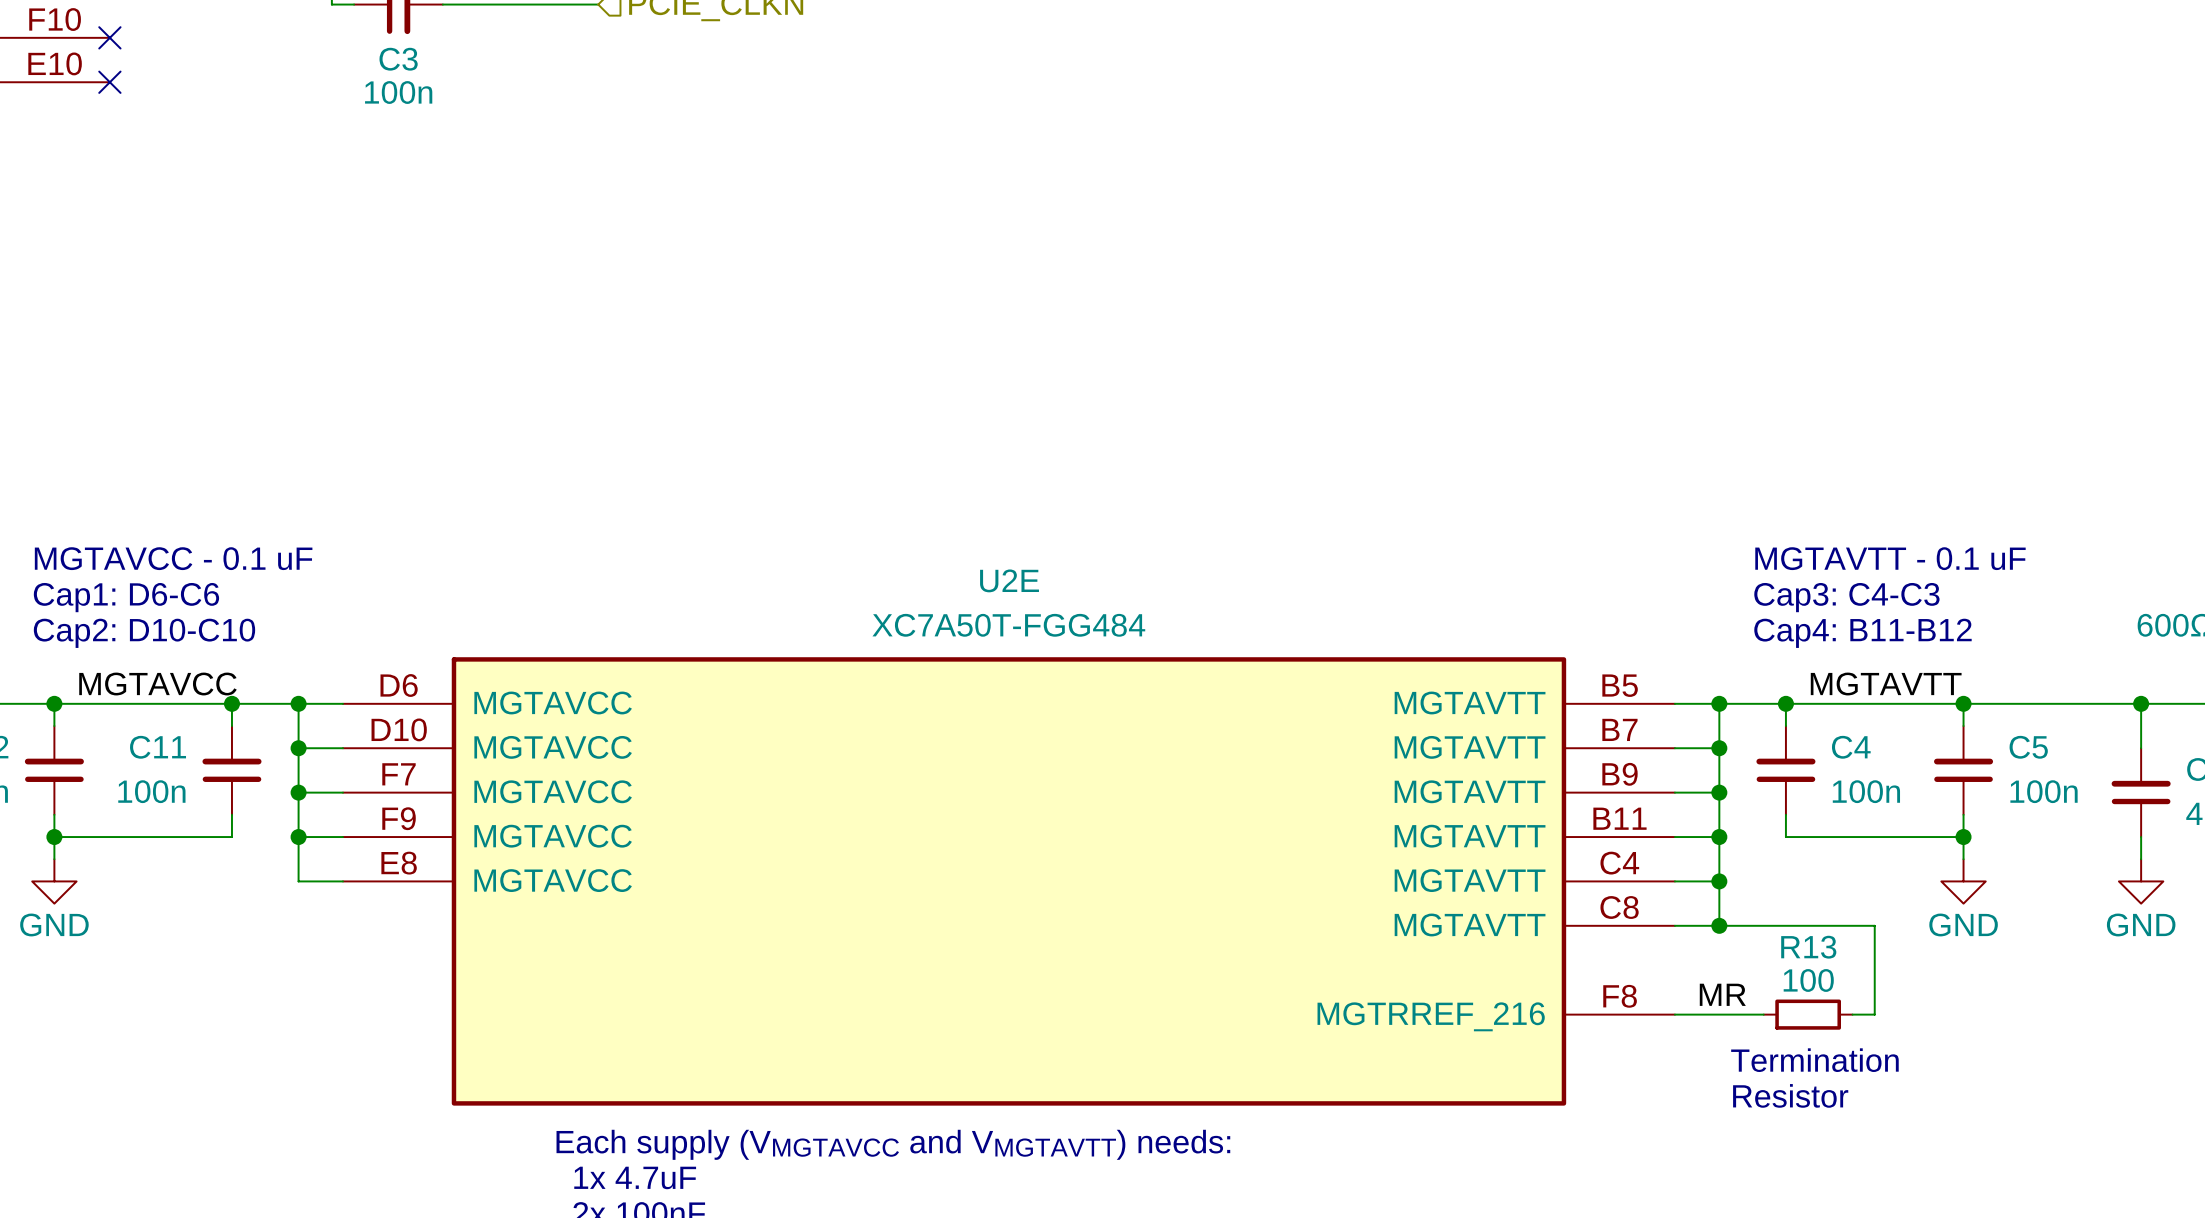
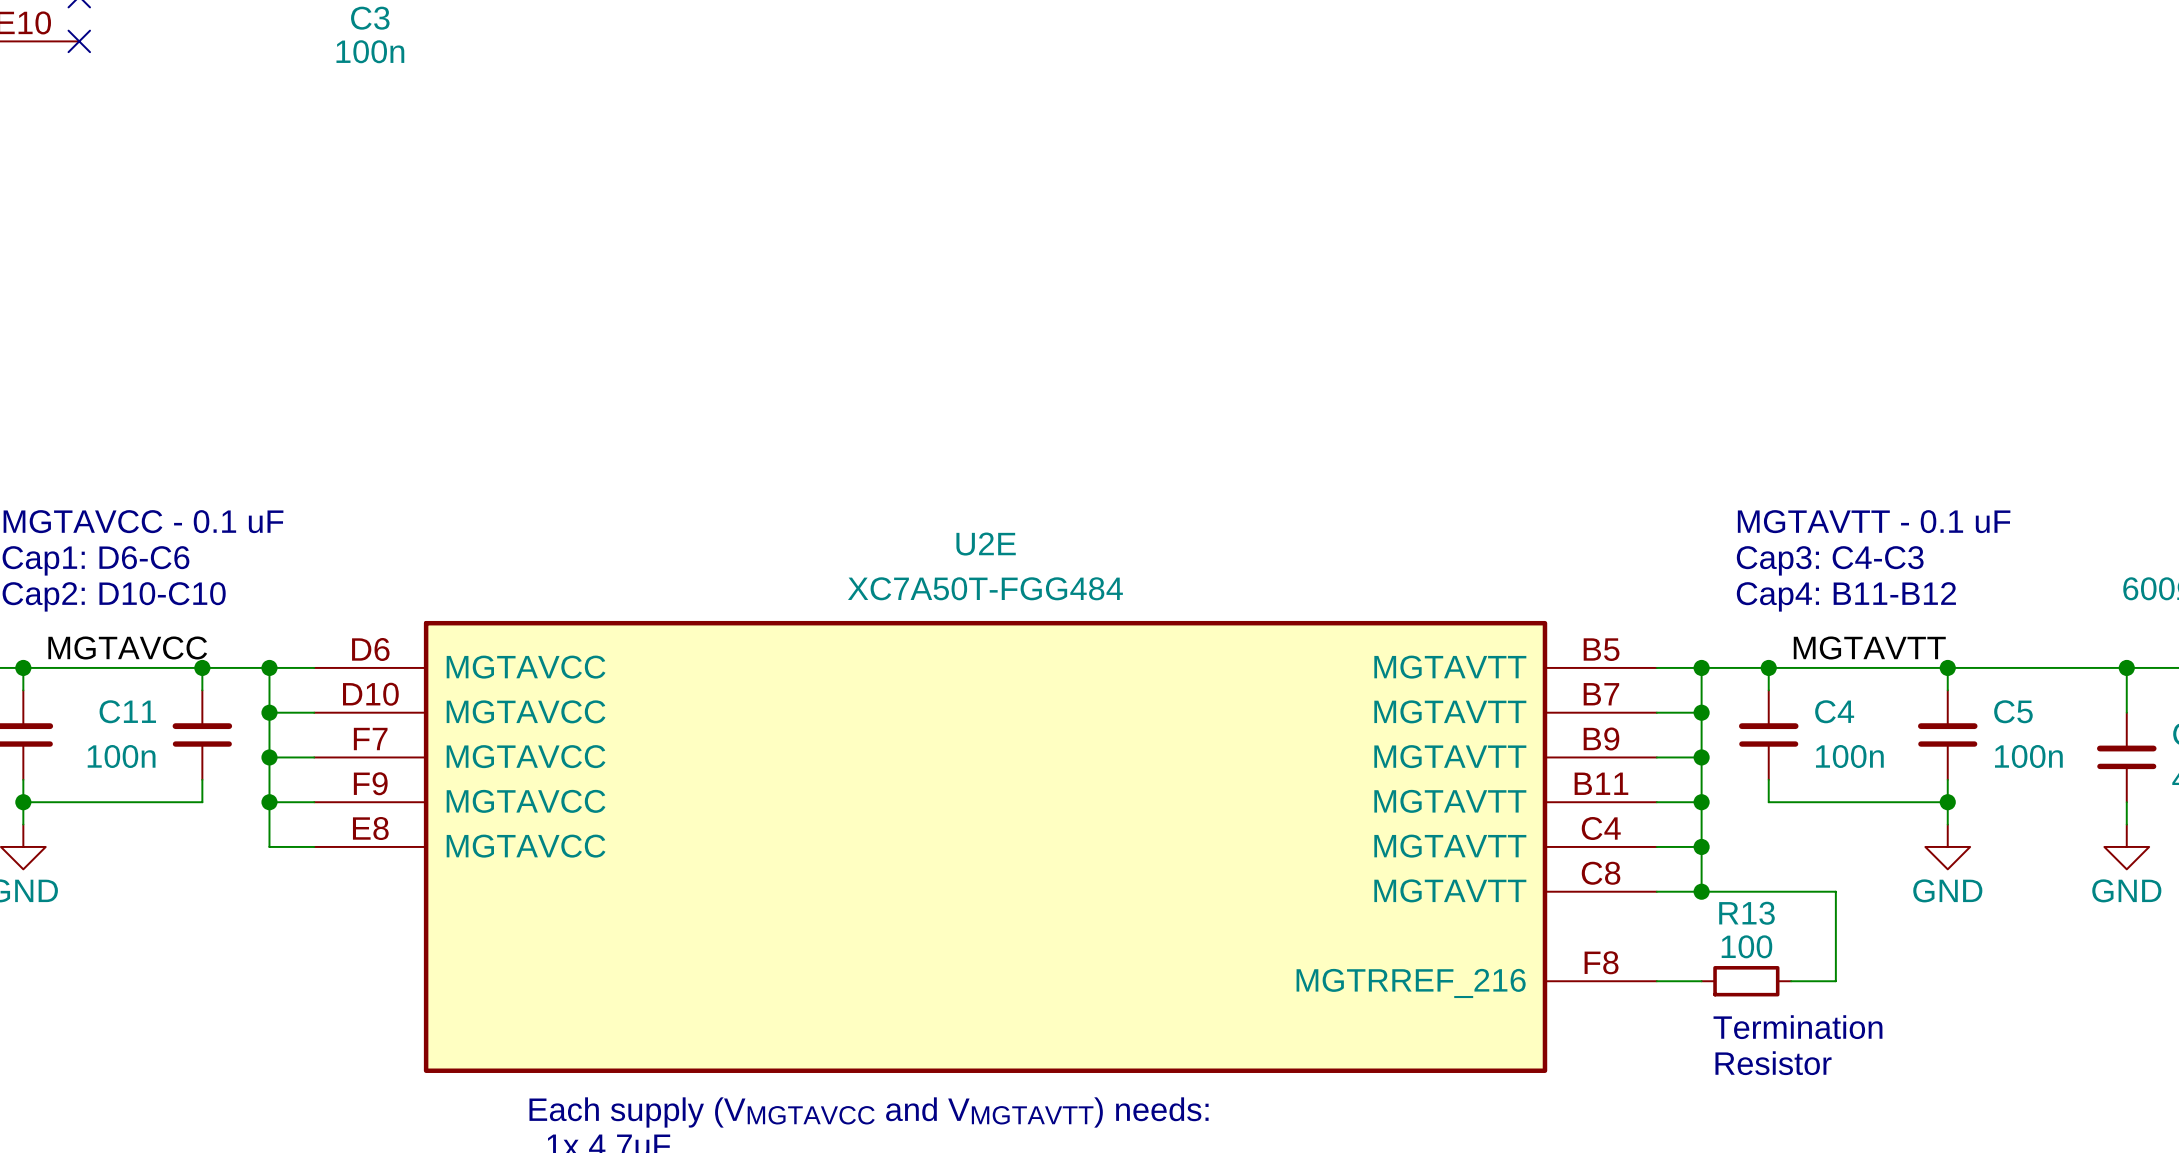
wire: (1852, 925) (1874, 925) (1874, 1014) (1852, 1014) -> (1835, 891) (1835, 981) (1791, 981)
label: MR (1722, 994) -> none
wire: (1719, 1014) (1763, 1014) -> none
R13 position: (1808, 1014) -> (1746, 981)

